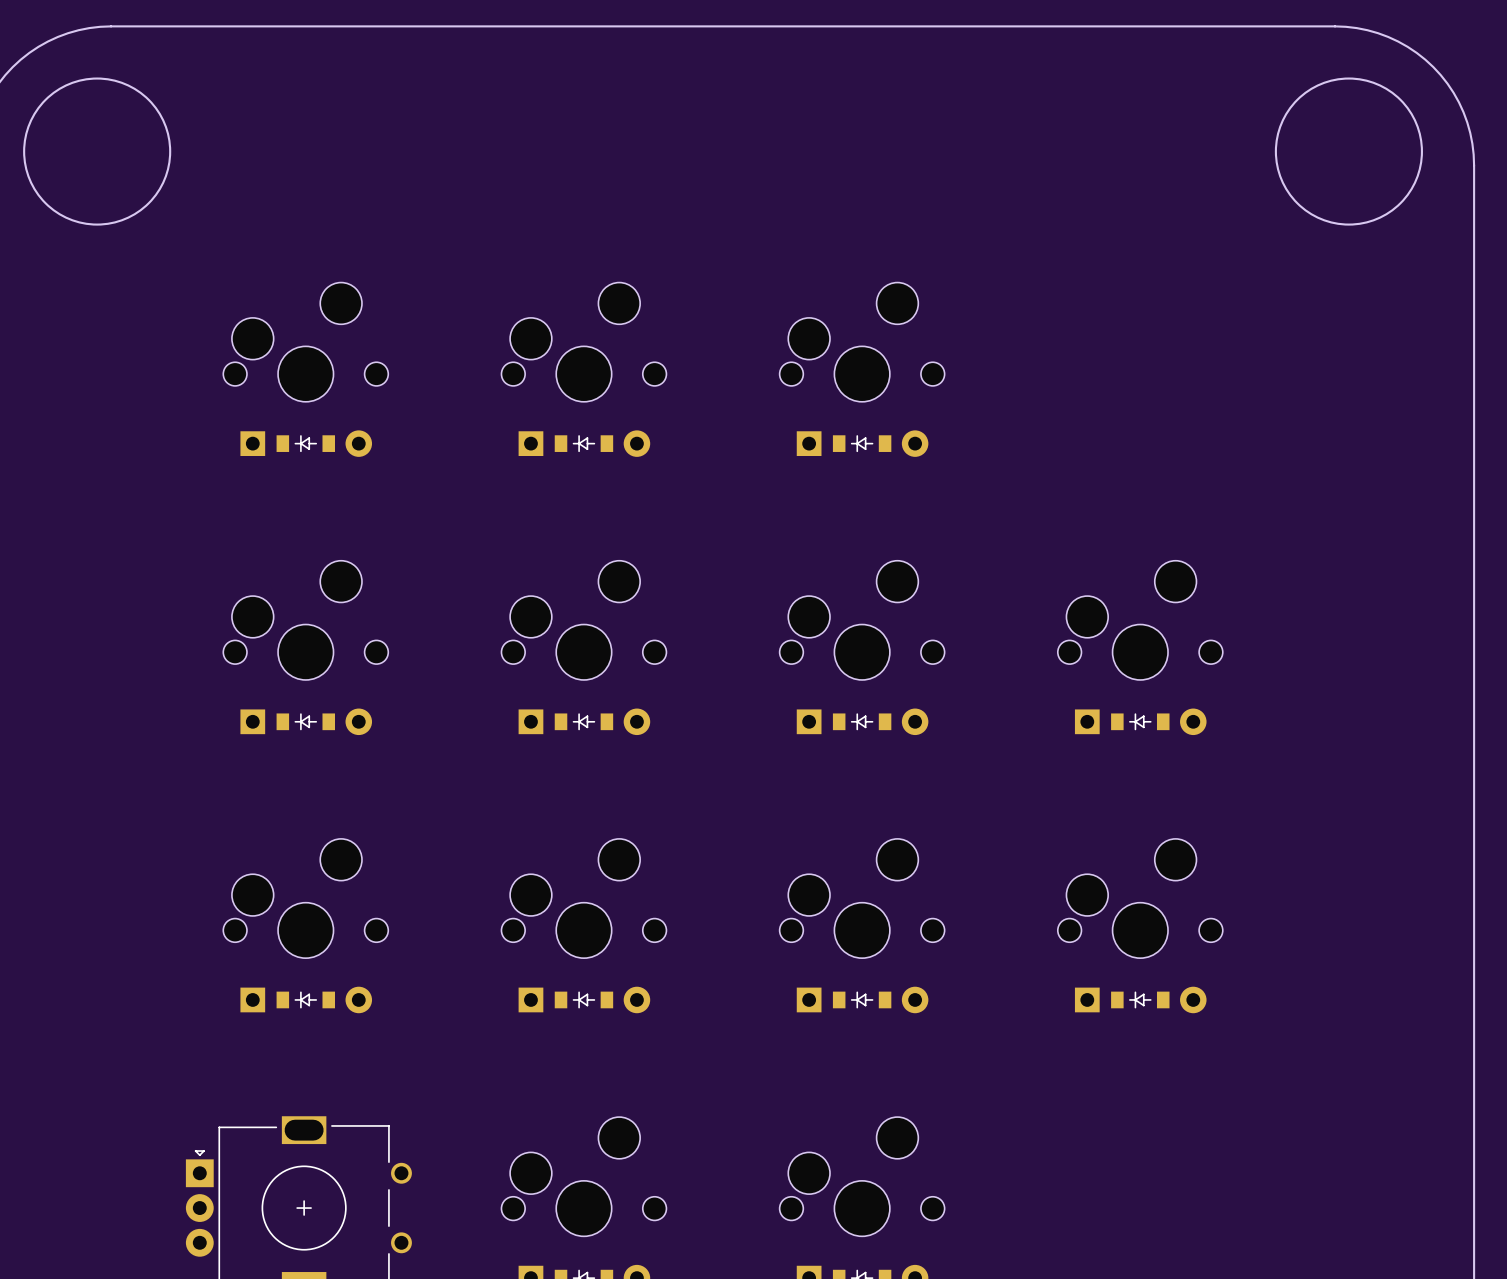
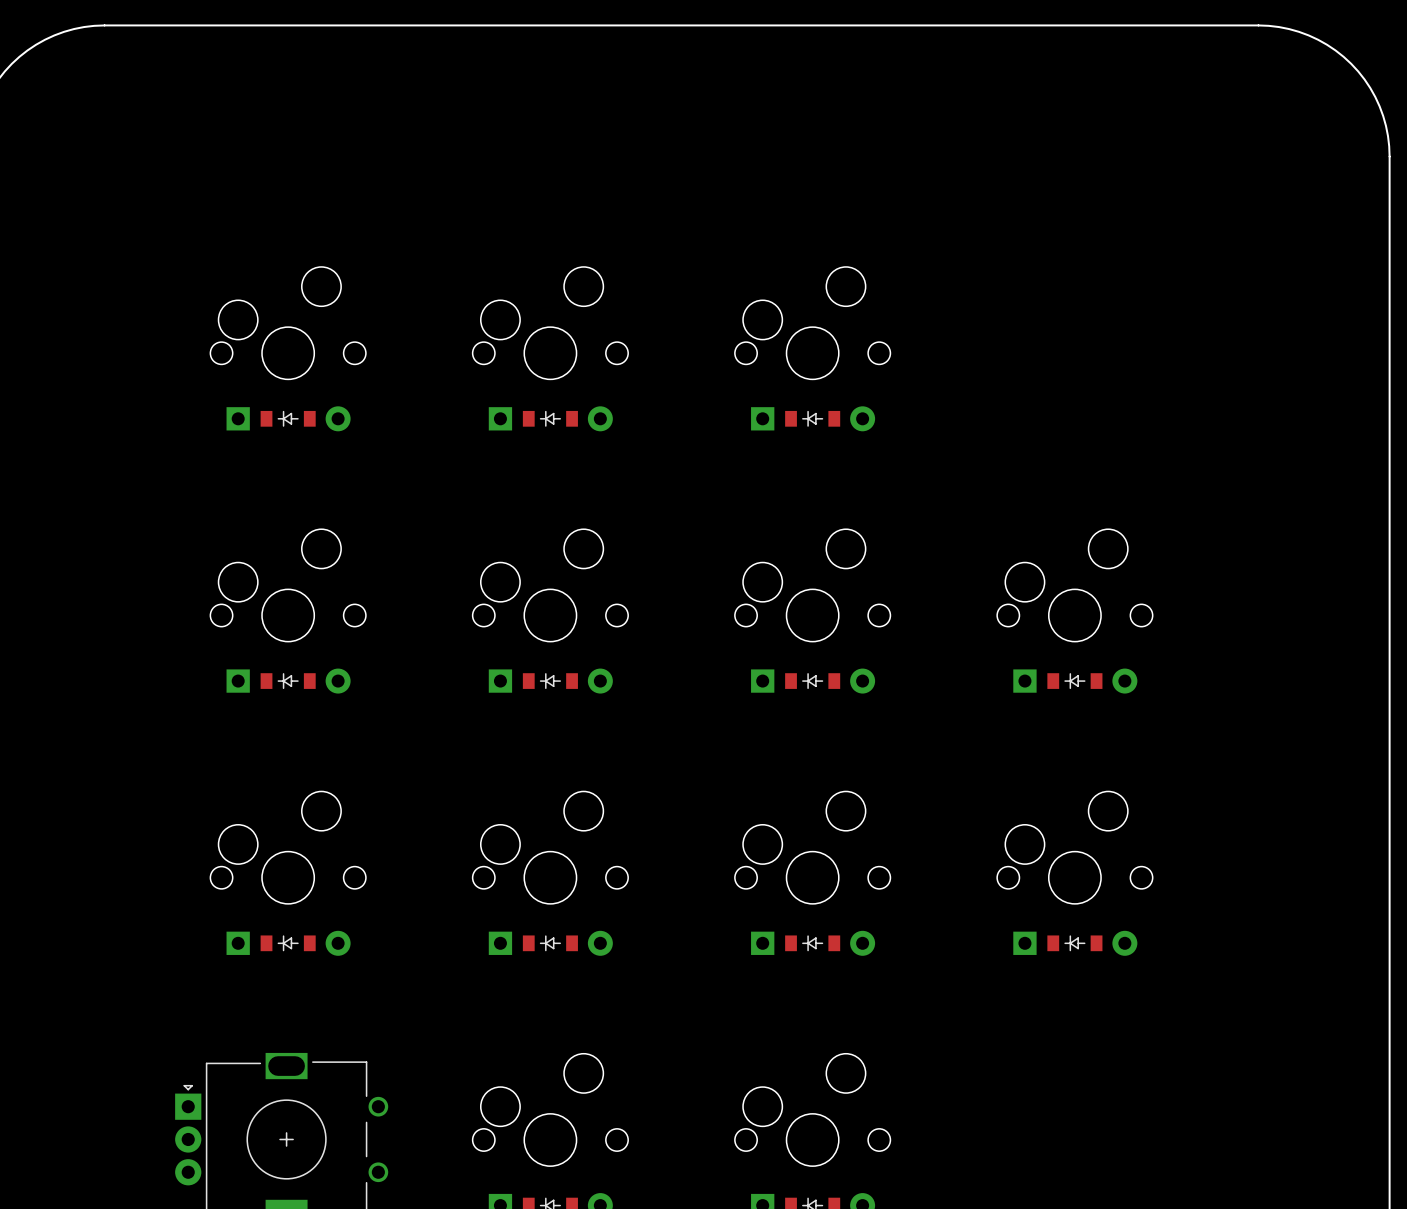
round board edge: [23, 77, 172, 226] -> none
round board edge: [1274, 77, 1423, 226] -> none

